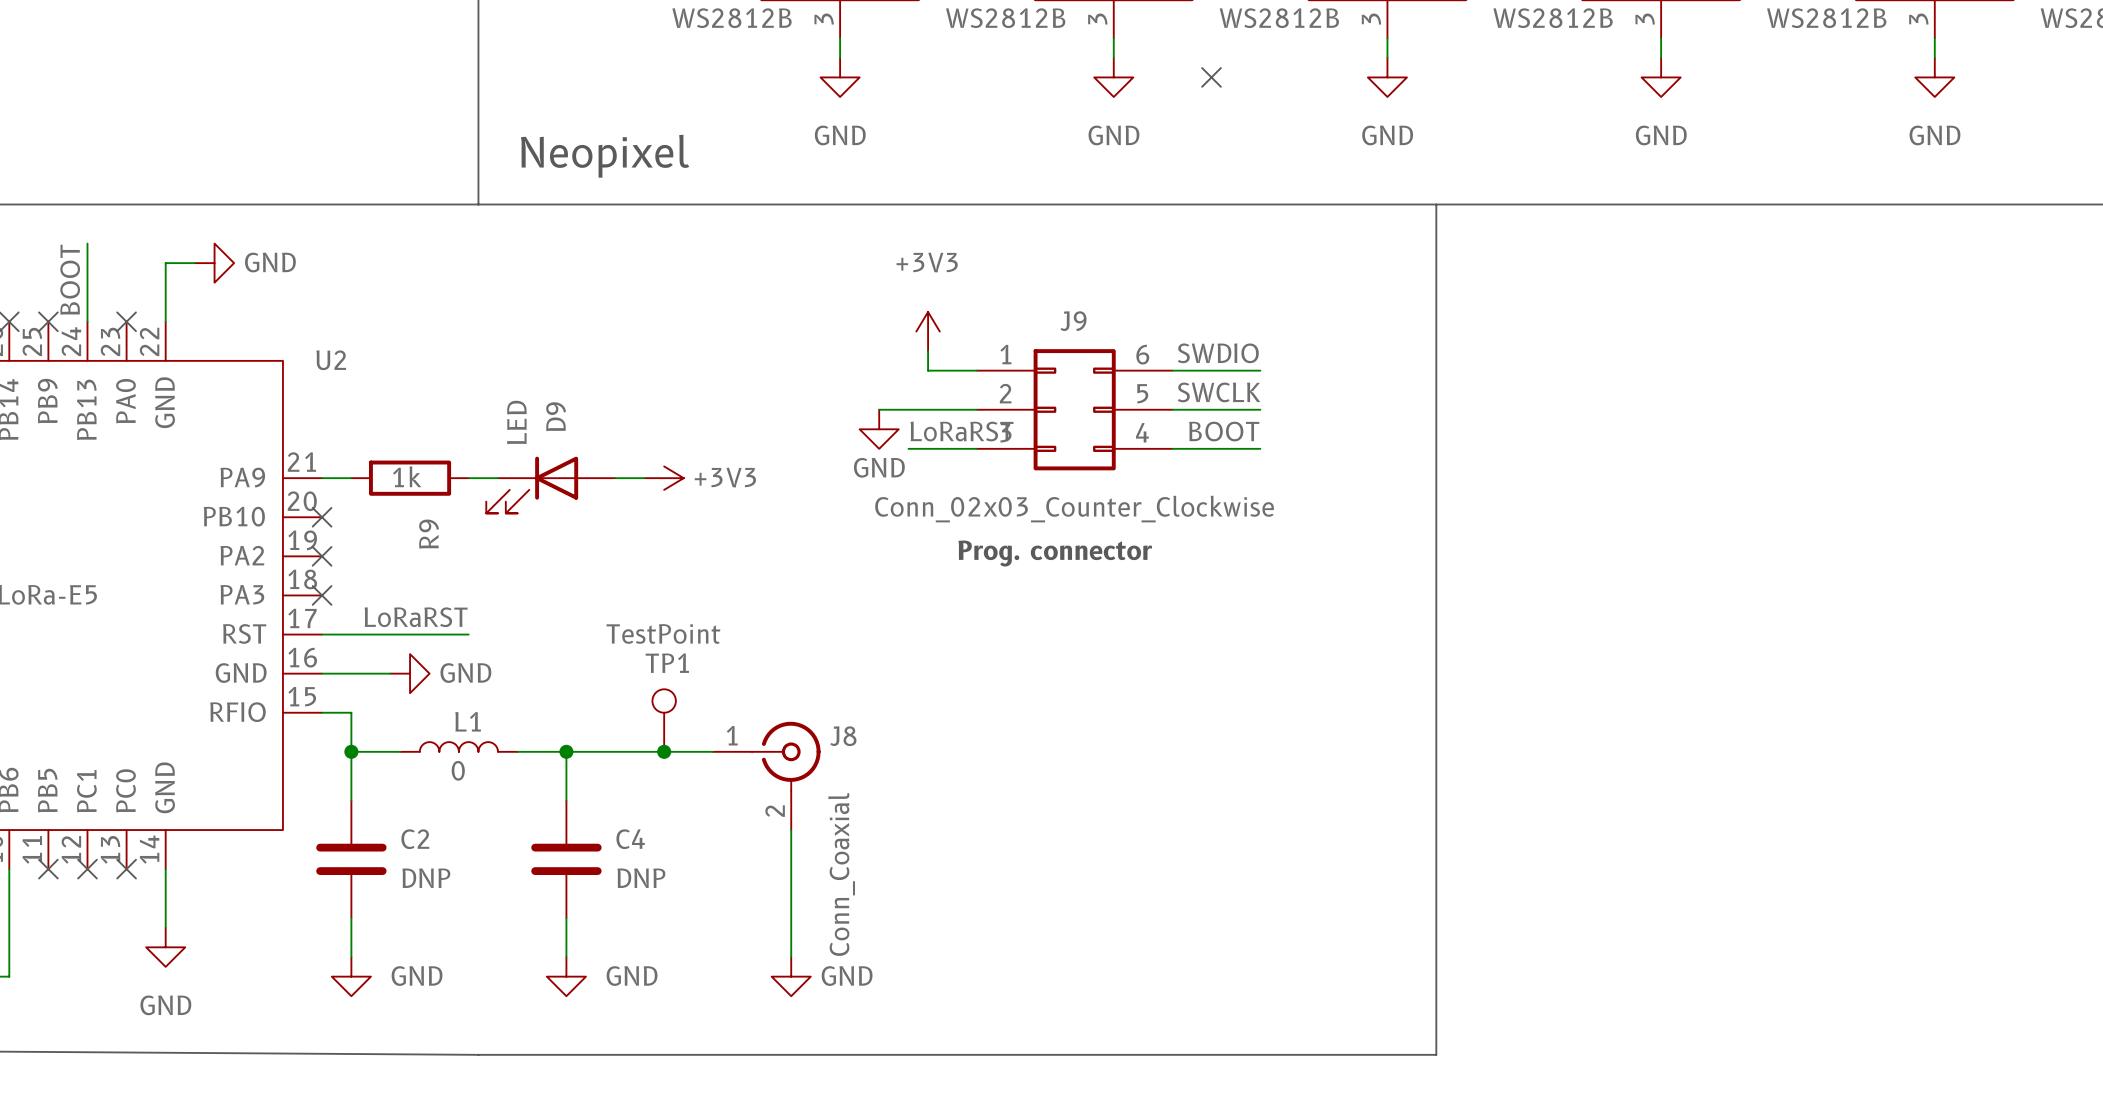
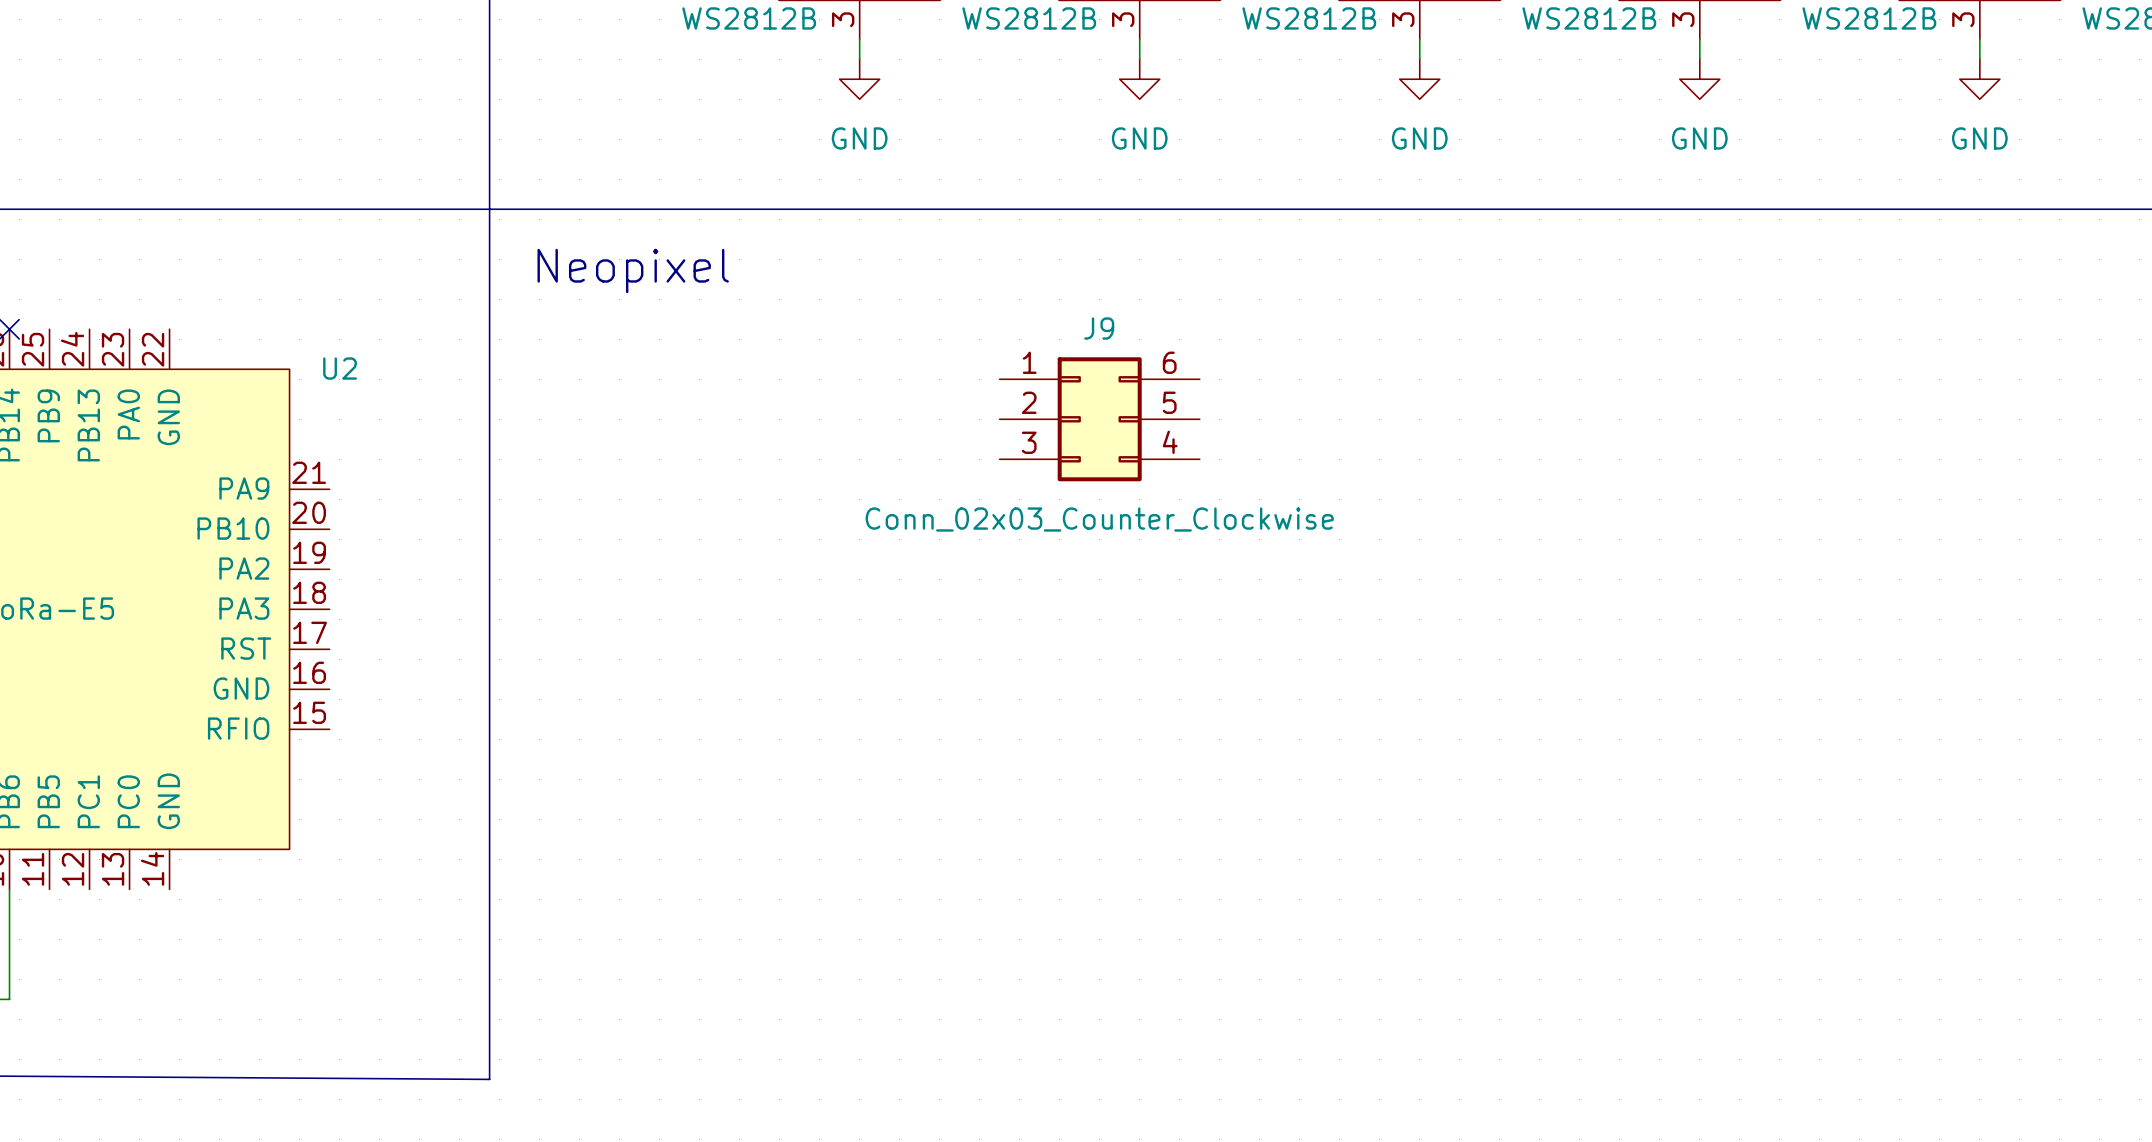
no-connect mark: (1211, 77) -> none
text position: Neopixel (605, 156) -> Neopixel (633, 270)
line: (1436, 204) (1436, 1054) (478, 1054) -> (489, 209) (489, 1079)
wire: (87, 243) (87, 321) -> none
wire: (195, 263) (165, 263) (165, 321) -> none
power symbol: GND (214, 263) -> none
label: BOOT (70, 279) -> none
no-connect mark: (48, 321) -> none
no-connect mark: (126, 321) -> none
power symbol: +3V3 (928, 331) -> none
wire: (928, 351) (928, 370) (976, 370) -> none
label: SWDIO (1218, 353) -> none
wire: (1172, 370) (1260, 370) -> none
label: SWCLK (1219, 392) -> none
wire: (879, 409) (976, 409) -> none
wire: (1172, 409) (1260, 409) -> none
power symbol: GND (879, 429) -> none
label: LoRaRST (962, 431) -> none
label: BOOT (1224, 431) -> none
wire: (908, 448) (976, 448) -> none
wire: (1172, 448) (1260, 448) -> none
wire: (322, 478) (351, 478) -> none
R9: 1k (410, 478) -> none
wire: (468, 478) (498, 478) -> none
wire: (615, 478) (644, 478) -> none
power symbol: +3V3 (664, 478) -> none
D9: LED (550, 485) -> none
no-connect mark: (322, 517) -> none
text: Prog. connector (1055, 553) -> none
no-connect mark: (322, 556) -> none
no-connect mark: (322, 595) -> none
label: LoRaRST (416, 617) -> none
wire: (322, 634) (468, 634) -> none
wire: (322, 673) (390, 673) -> none
power symbol: GND (410, 673) -> none
wire: (322, 712) (351, 712) (351, 800) -> none
TP1: TestPoint (664, 720) -> none
L1: 0 (458, 746) -> none
wire: (351, 751) (400, 751) -> none
junction: (351, 751) -> none
wire: (517, 751) (713, 751) -> none
wire: (566, 751) (566, 800) -> none
junction: (566, 751) -> none
junction: (664, 751) -> none
J8: Conn_Coaxial (766, 775) -> none
wire: (791, 830) (791, 957) -> none
C2: DNP (351, 859) -> none
C4: DNP (566, 859) -> none
no-connect mark: (48, 869) -> none
no-connect mark: (87, 869) -> none
no-connect mark: (126, 869) -> none
wire: (165, 869) (165, 927) -> none
wire: (351, 918) (351, 957) -> none
wire: (566, 918) (566, 957) -> none
power symbol: GND (165, 947) -> none
power symbol: GND (351, 976) -> none
power symbol: GND (566, 976) -> none
power symbol: GND (791, 976) -> none

